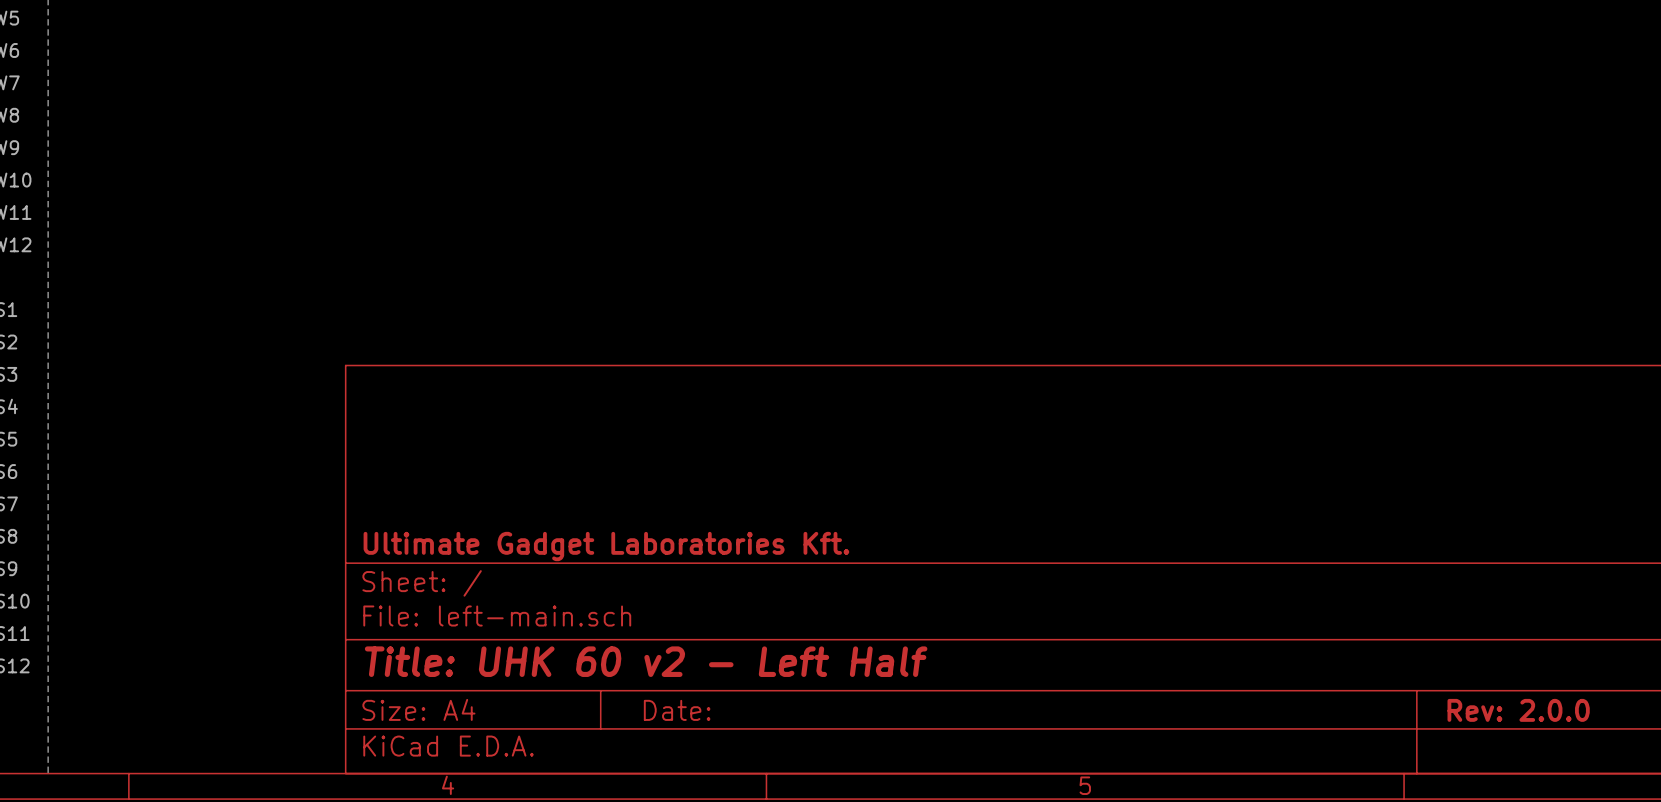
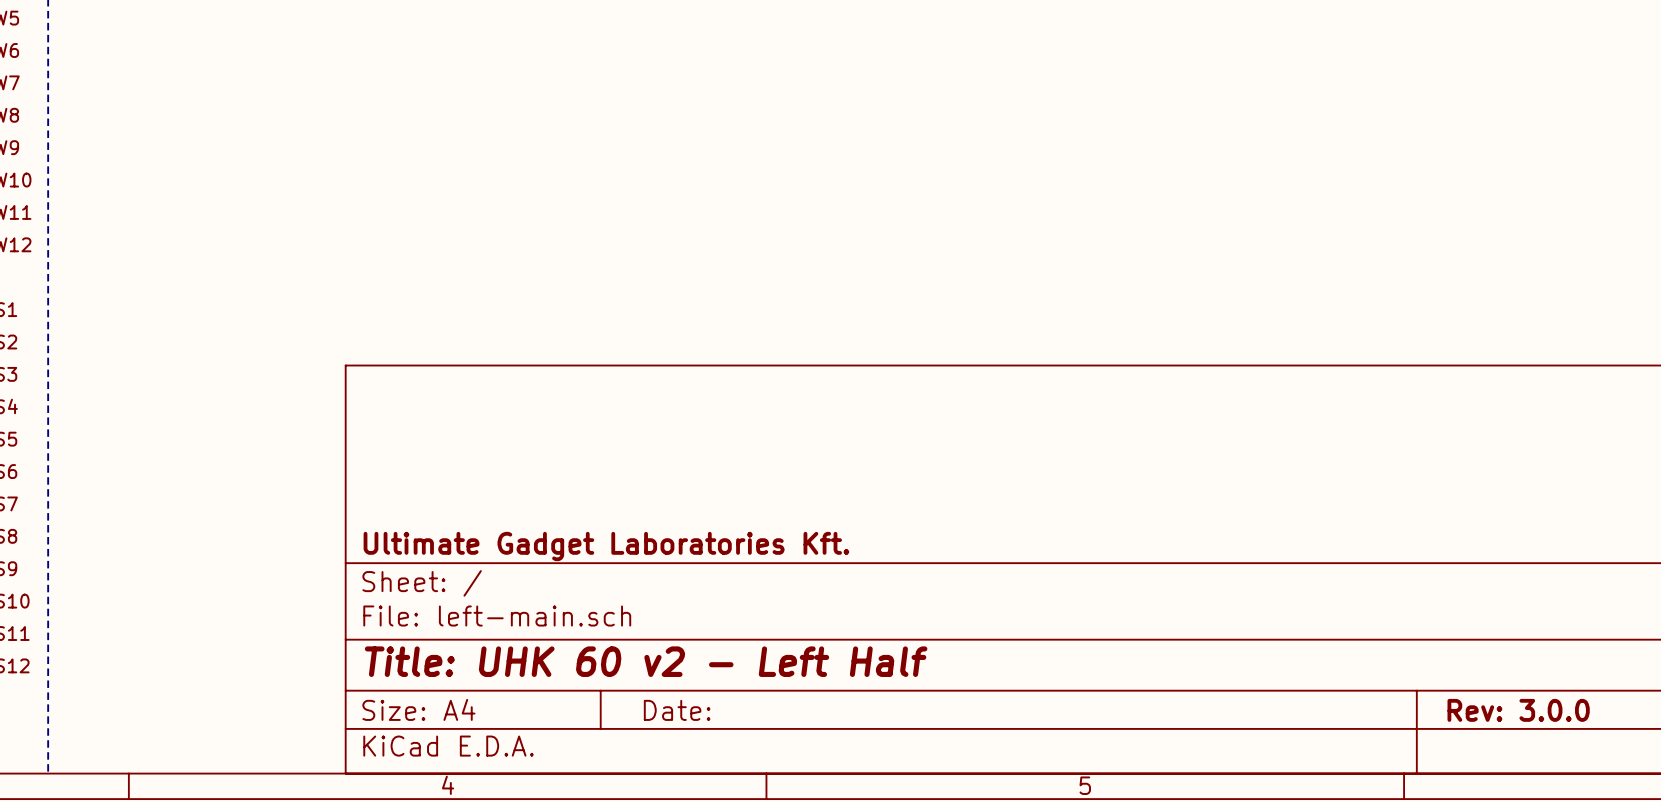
title block: Rev: 2.0.0 (1518, 710) -> Rev: 3.0.0 (1518, 710)

